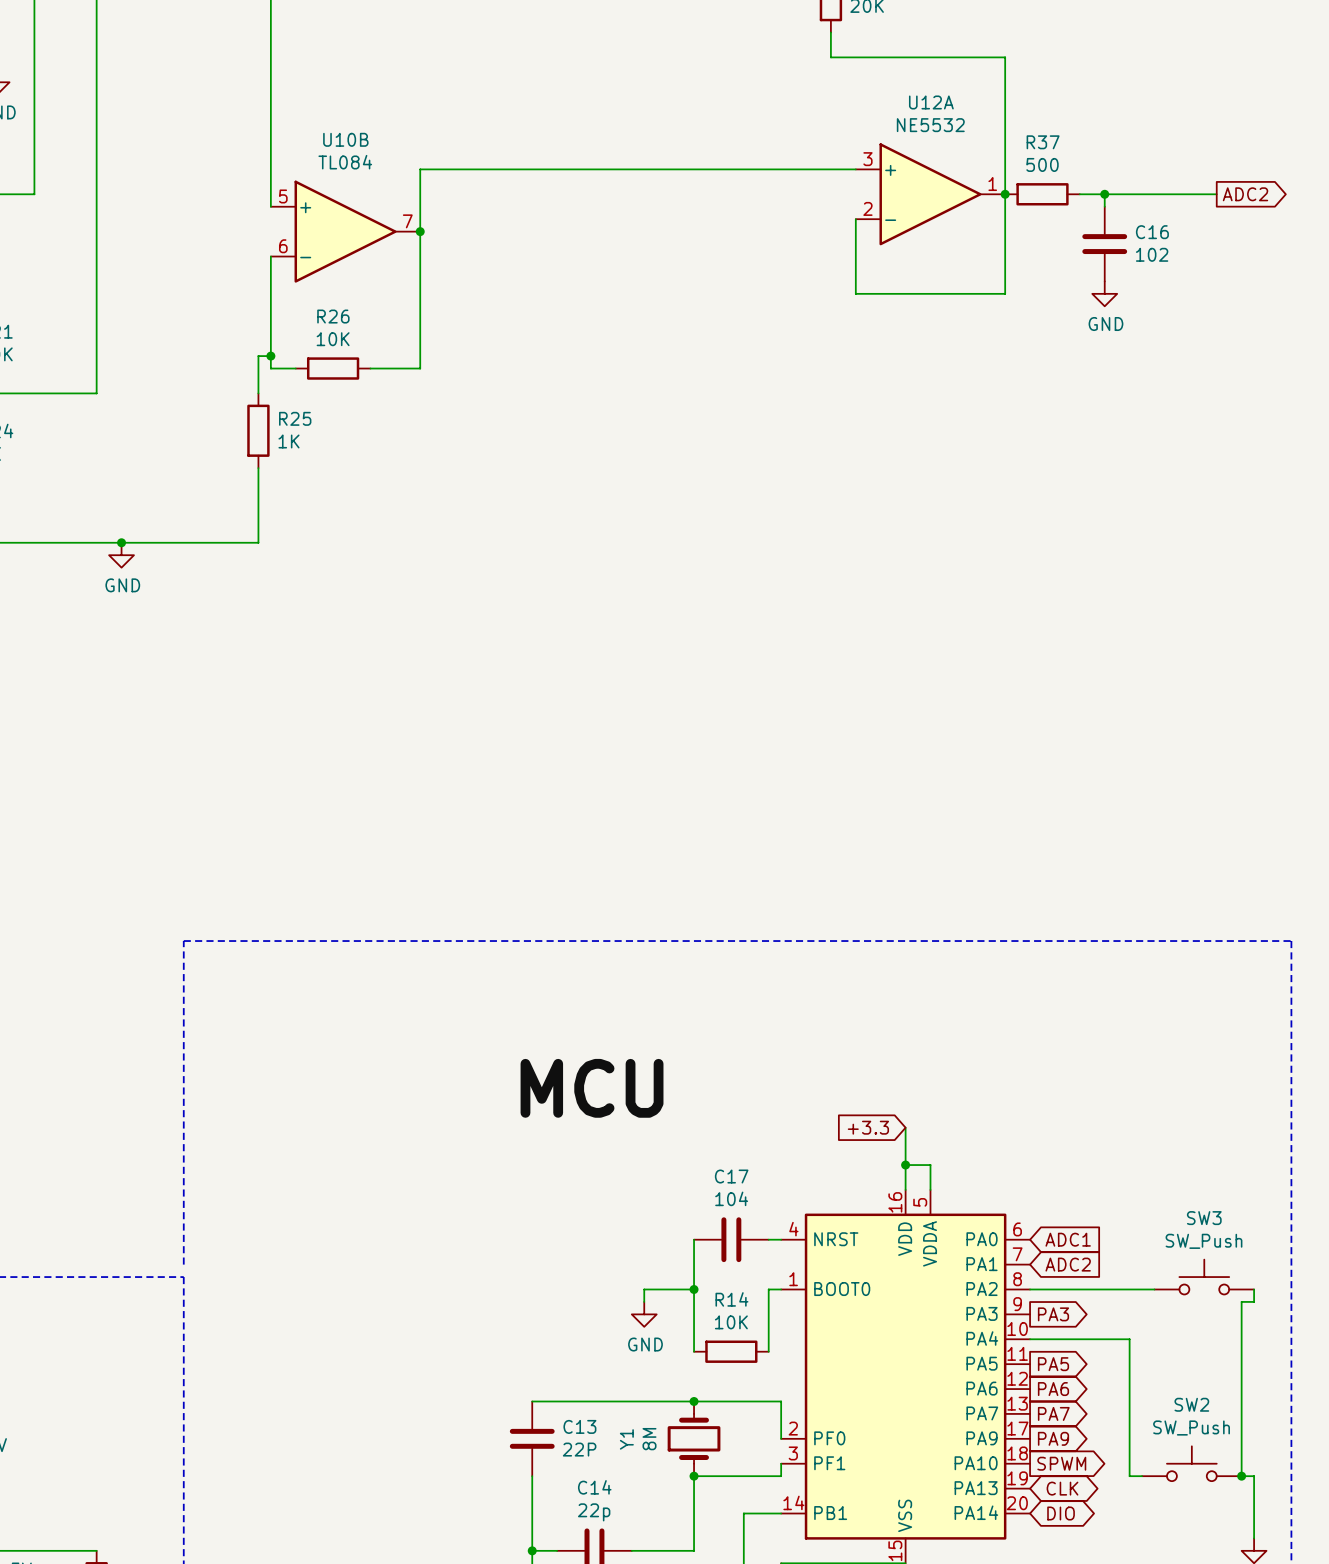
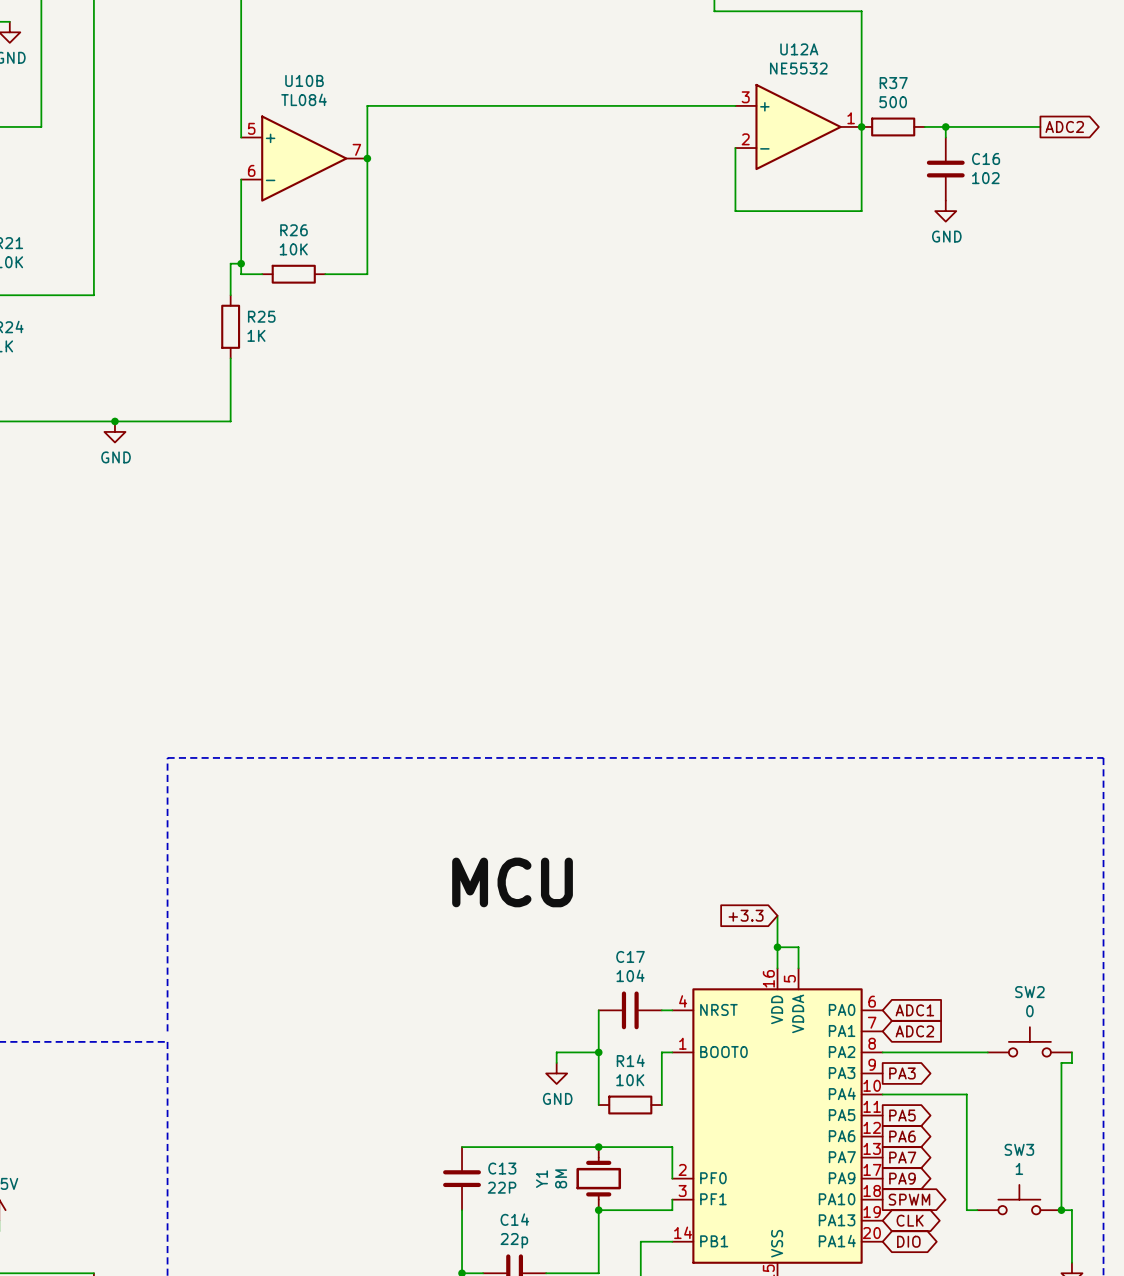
SW3 name: SW3 (1204, 1218) -> SW2 (1029, 992)
SW3 value: SW_Push (1203, 1241) -> 0 (1029, 1011)
SW2 name: SW2 (1191, 1404) -> SW3 (1019, 1149)
SW2 value: SW_Push (1191, 1428) -> 1 (1019, 1168)

